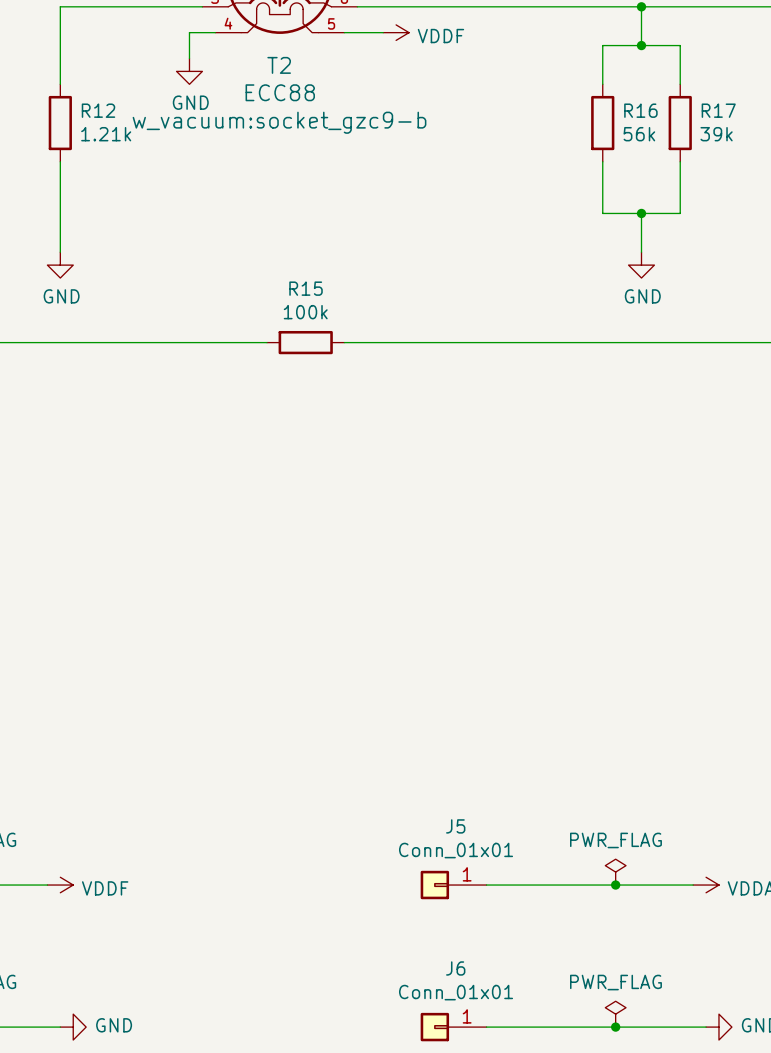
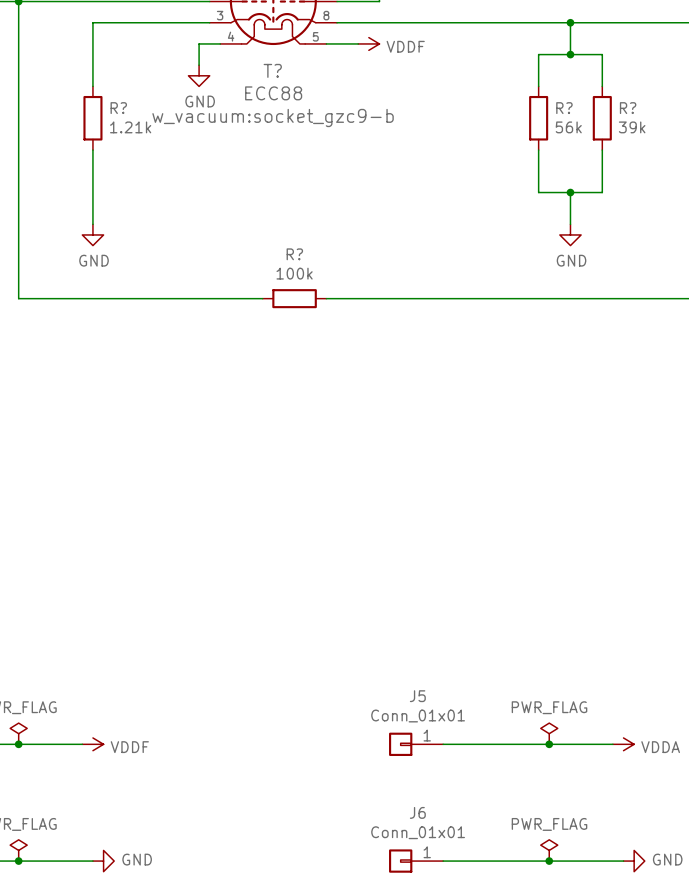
T2 name: T2 (279, 65) -> T? (272, 70)
R12 name: R12 (98, 110) -> R? (118, 108)
R16 name: R16 (640, 110) -> R? (564, 108)
R17 name: R17 (718, 110) -> R? (628, 108)
R15 name: R15 (306, 288) -> R? (294, 254)

